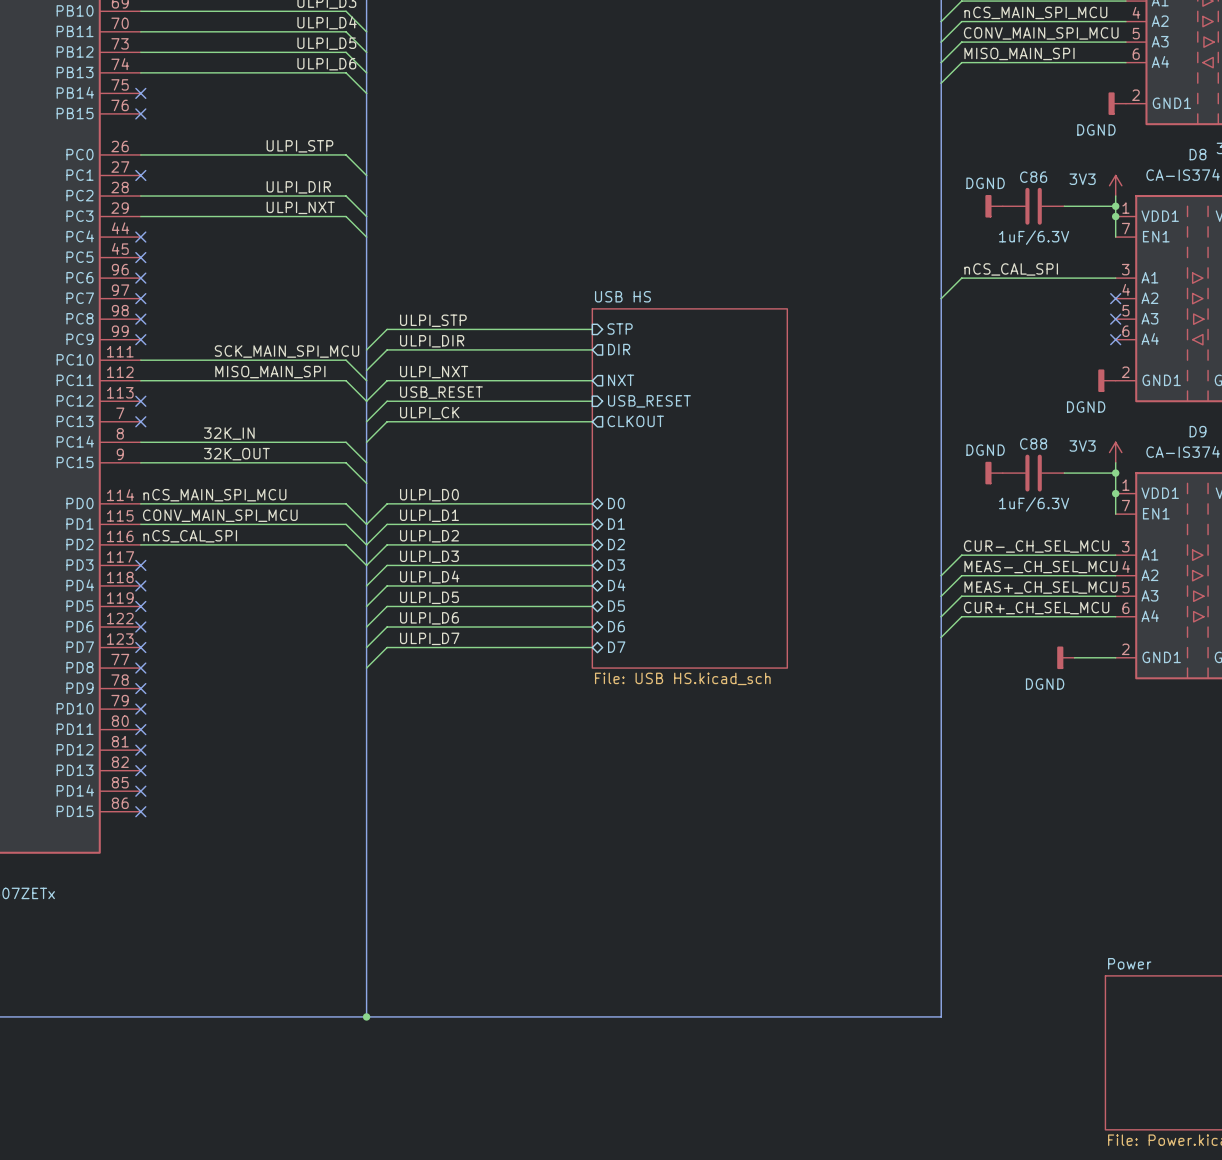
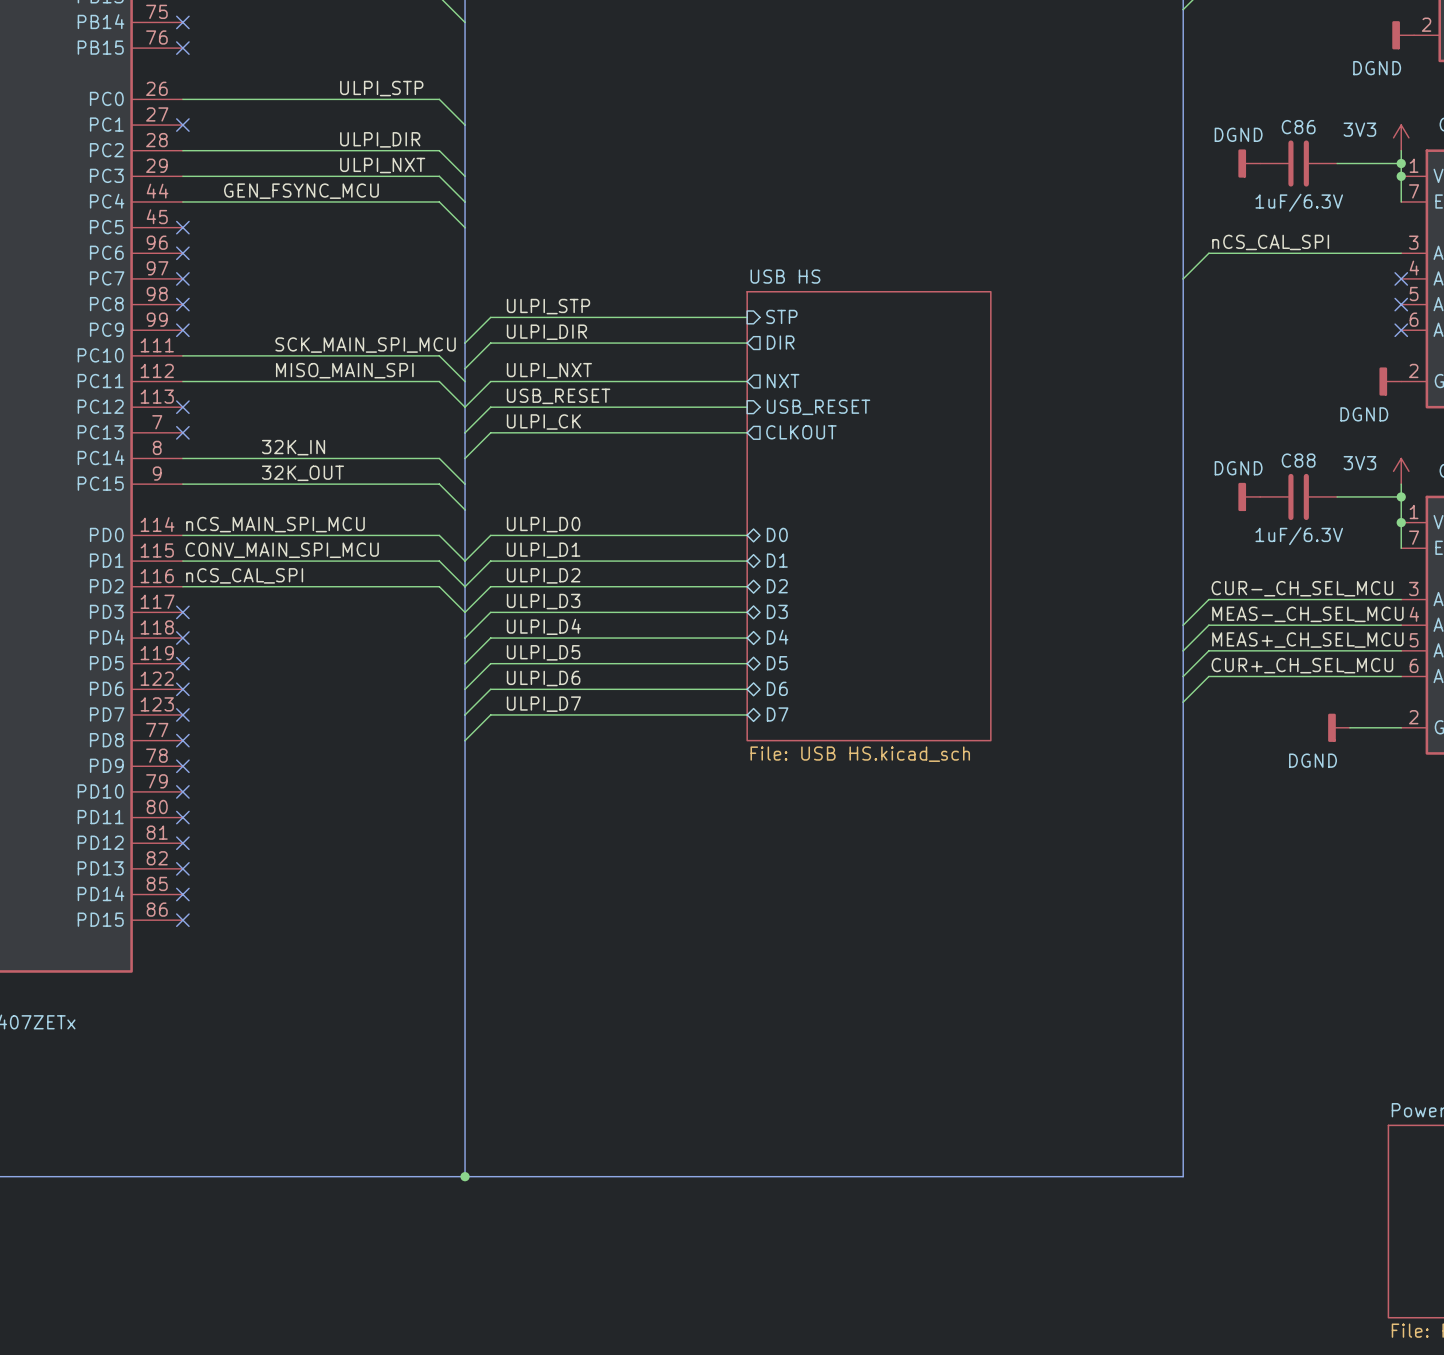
label: none -> GEN_FSYNC_MCU (301, 191)
wire: none -> (182, 201) (439, 201) (465, 227)
no-connect mark: (140, 237) -> none

